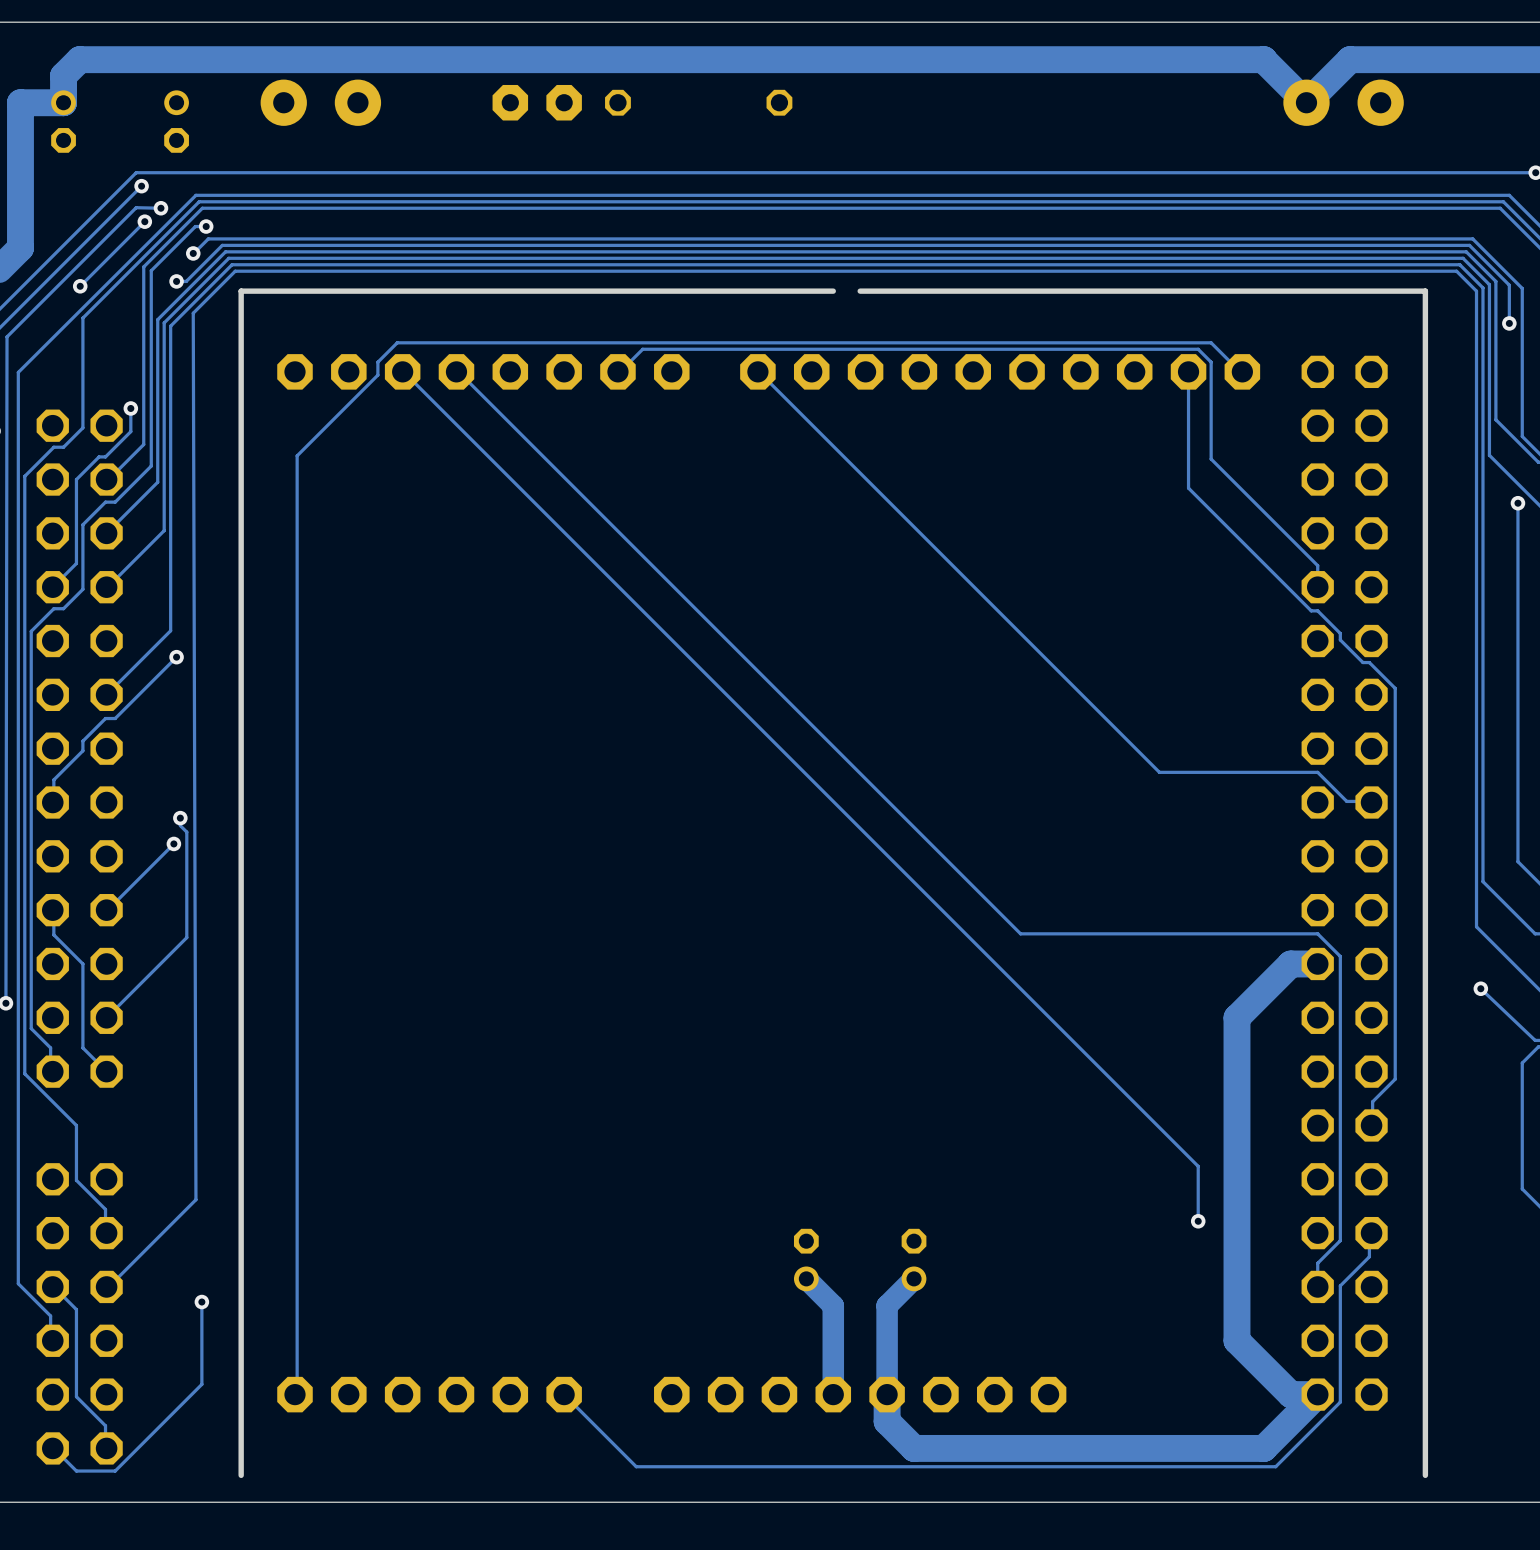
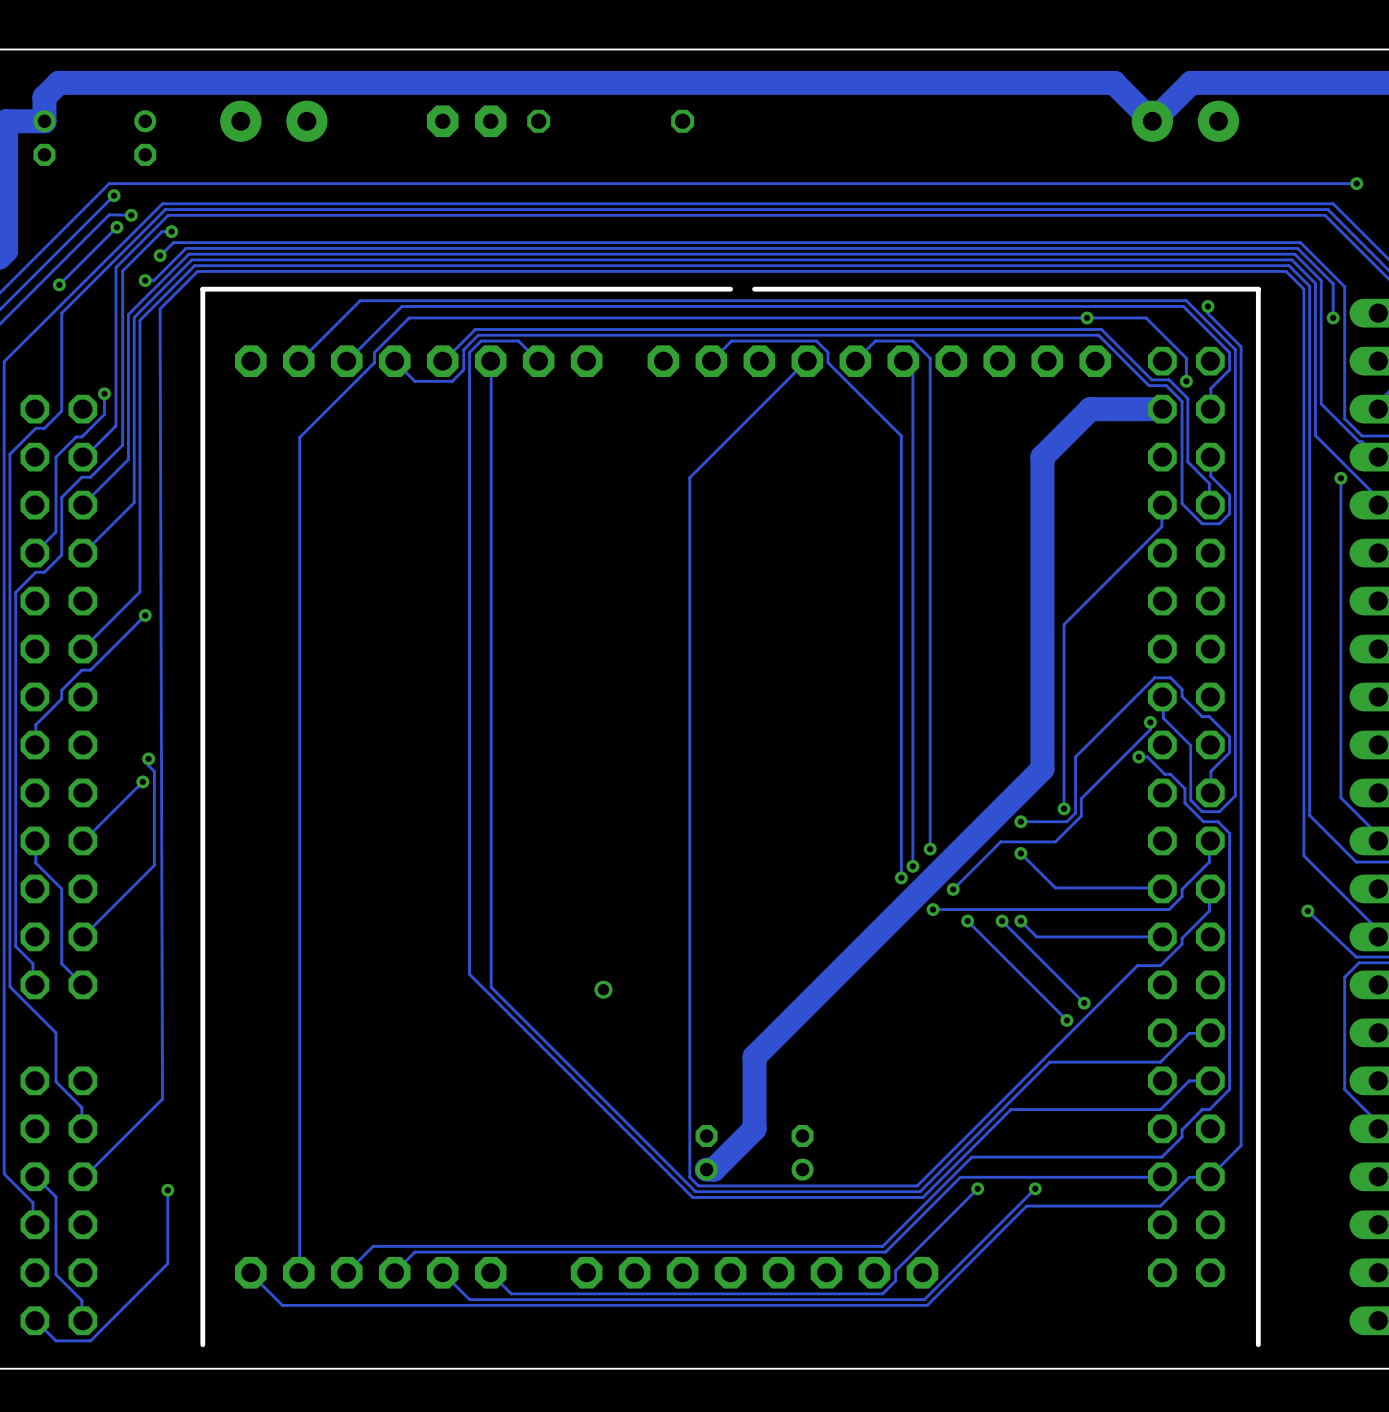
via: none -> (1207, 306)
via: none -> (1087, 317)
track: (550, 342) (397, 342) (377, 362) (377, 375) (297, 455) (297, 1392) (294, 1394) -> (1207, 306) (1207, 313) (1241, 346) (1241, 1145) (1210, 1176) (1189, 1177) (1160, 1206) (1026, 1206) (927, 1305) (282, 1305) (250, 1272)
track: none -> (478, 335) (463, 349) (463, 369) (452, 381) (414, 381) (394, 361)
track: (1211, 342) (1242, 371) -> (1067, 335) (1098, 335) (1148, 385) (1166, 385) (1182, 401) (1182, 503) (1202, 523) (1219, 523) (1229, 513) (1229, 495) (1210, 476) (1210, 457)
track: (834, 349) (642, 349) (617, 371) -> (731, 341) (711, 361)
track: none -> (816, 341) (827, 352) (827, 362) (901, 436) (901, 877)
track: (995, 349) (929, 349) -> (875, 341) (855, 361)
track: (1037, 349) (1198, 349) (1211, 362) (1211, 459) (1317, 565) (1317, 587) -> (912, 341) (930, 358) (930, 849)
track: none -> (298, 361) (360, 300) (1186, 300) (1235, 349) (1235, 795) (1219, 811) (1202, 811) (1190, 800) (1190, 745) (1163, 718) (1162, 697)
track: (403, 371) (1198, 1166) (1198, 1221) -> (347, 361) (401, 306) (1183, 306) (1229, 352) (1229, 369) (1210, 388) (1210, 409)
track: (456, 371) (458, 371) (1020, 933) (1317, 933) (1340, 956) (1340, 1240) (1317, 1263) (1317, 1286) -> (394, 1272) (414, 1252) (885, 1252) (960, 1177) (1162, 1176)
track: none -> (442, 361) (475, 329) (1101, 329) (1151, 379) (1169, 379) (1187, 398) (1187, 461) (1209, 483) (1210, 505)
track: none -> (538, 361) (518, 341) (481, 341) (469, 352) (469, 974) (692, 1197) (922, 1197) (1010, 1109) (1160, 1109) (1189, 1080) (1210, 1080)
track: (757, 371) (1159, 772) (1317, 772) (1346, 801) (1371, 802) -> none
track: none -> (807, 361) (689, 477) (689, 1177) (698, 1185) (917, 1185) (1137, 965) (1160, 965) (1182, 944) (1182, 938) (1209, 911) (1210, 888)
track: none -> (903, 361) (912, 369) (912, 866)
track: (1188, 371) (1188, 488) (1311, 610) (1317, 610) (1340, 633) (1340, 639) (1362, 662) (1369, 662) (1395, 688) (1395, 1079) (1372, 1101) (1371, 1125) -> (490, 361) (491, 987) (695, 1191) (920, 1191) (1049, 1062) (1160, 1062) (1189, 1033) (1210, 1032)
track: none -> (1186, 381) (1186, 358) (1146, 317) (409, 317) (374, 352) (374, 362) (299, 437) (298, 1272)
via: none -> (1186, 381)
track: none -> (1162, 505) (1161, 526) (1064, 624) (1064, 808)
track: none -> (1150, 722) (1150, 729) (1081, 798) (1081, 816) (1055, 841) (1000, 841) (953, 889)
via: none -> (1150, 722)
track: none -> (1138, 756) (1147, 756) (1164, 774) (1170, 774) (1184, 788) (1184, 803) (1203, 821) (1218, 821) (1229, 833) (1229, 1089) (1209, 1109) (1202, 1109) (1182, 1129) (1182, 1136) (1161, 1157) (971, 1157) (882, 1246) (373, 1246) (346, 1272)
via: none -> (1138, 756)
track: none -> (1210, 792) (1210, 771) (1229, 752) (1229, 736) (1209, 716) (1202, 716) (1182, 696) (1182, 689) (1170, 677) (1154, 677) (1075, 756) (1075, 813) (1066, 821) (1020, 821)
via: none -> (1064, 808)
via: none -> (1020, 821)
track: none -> (1210, 840) (1209, 862) (1182, 889) (1182, 896) (1169, 909) (933, 909)
via: none -> (930, 849)
via: none -> (1020, 853)
via: none -> (912, 866)
via: none -> (901, 877)
track: (1317, 963) (1290, 963) (1236, 1017) (1236, 1340) (1290, 1394) (1317, 1394) (1263, 1448) (914, 1448) (887, 1421) (887, 1305) (914, 1278) -> (1162, 888) (1055, 887) (1020, 853)
via: none -> (953, 889)
via: none -> (933, 909)
track: none -> (967, 921) (1066, 1020)
via: none -> (967, 921)
track: none -> (1002, 921) (1084, 1003)
via: none -> (1002, 921)
track: none -> (1020, 921) (1036, 936) (1162, 936)
via: none -> (1020, 921)
via: none -> (603, 989)
via: none -> (1084, 1003)
via: none -> (1066, 1020)
via: (1198, 1221) -> none
track: (1371, 1233) (1369, 1234) (1369, 1256) (1340, 1285) (1340, 1402) (1275, 1466) (636, 1466) (564, 1394) -> (977, 1188) (895, 1270) (895, 1280) (882, 1293) (511, 1293) (490, 1272)
track: (806, 1278) (833, 1305) (833, 1394) -> (706, 1169) (713, 1169) (754, 1128) (754, 1056) (1042, 768) (1042, 457) (1090, 409) (1162, 409)
via: none -> (977, 1188)
track: none -> (1035, 1188) (924, 1299) (469, 1299) (442, 1272)
via: none -> (1035, 1188)

